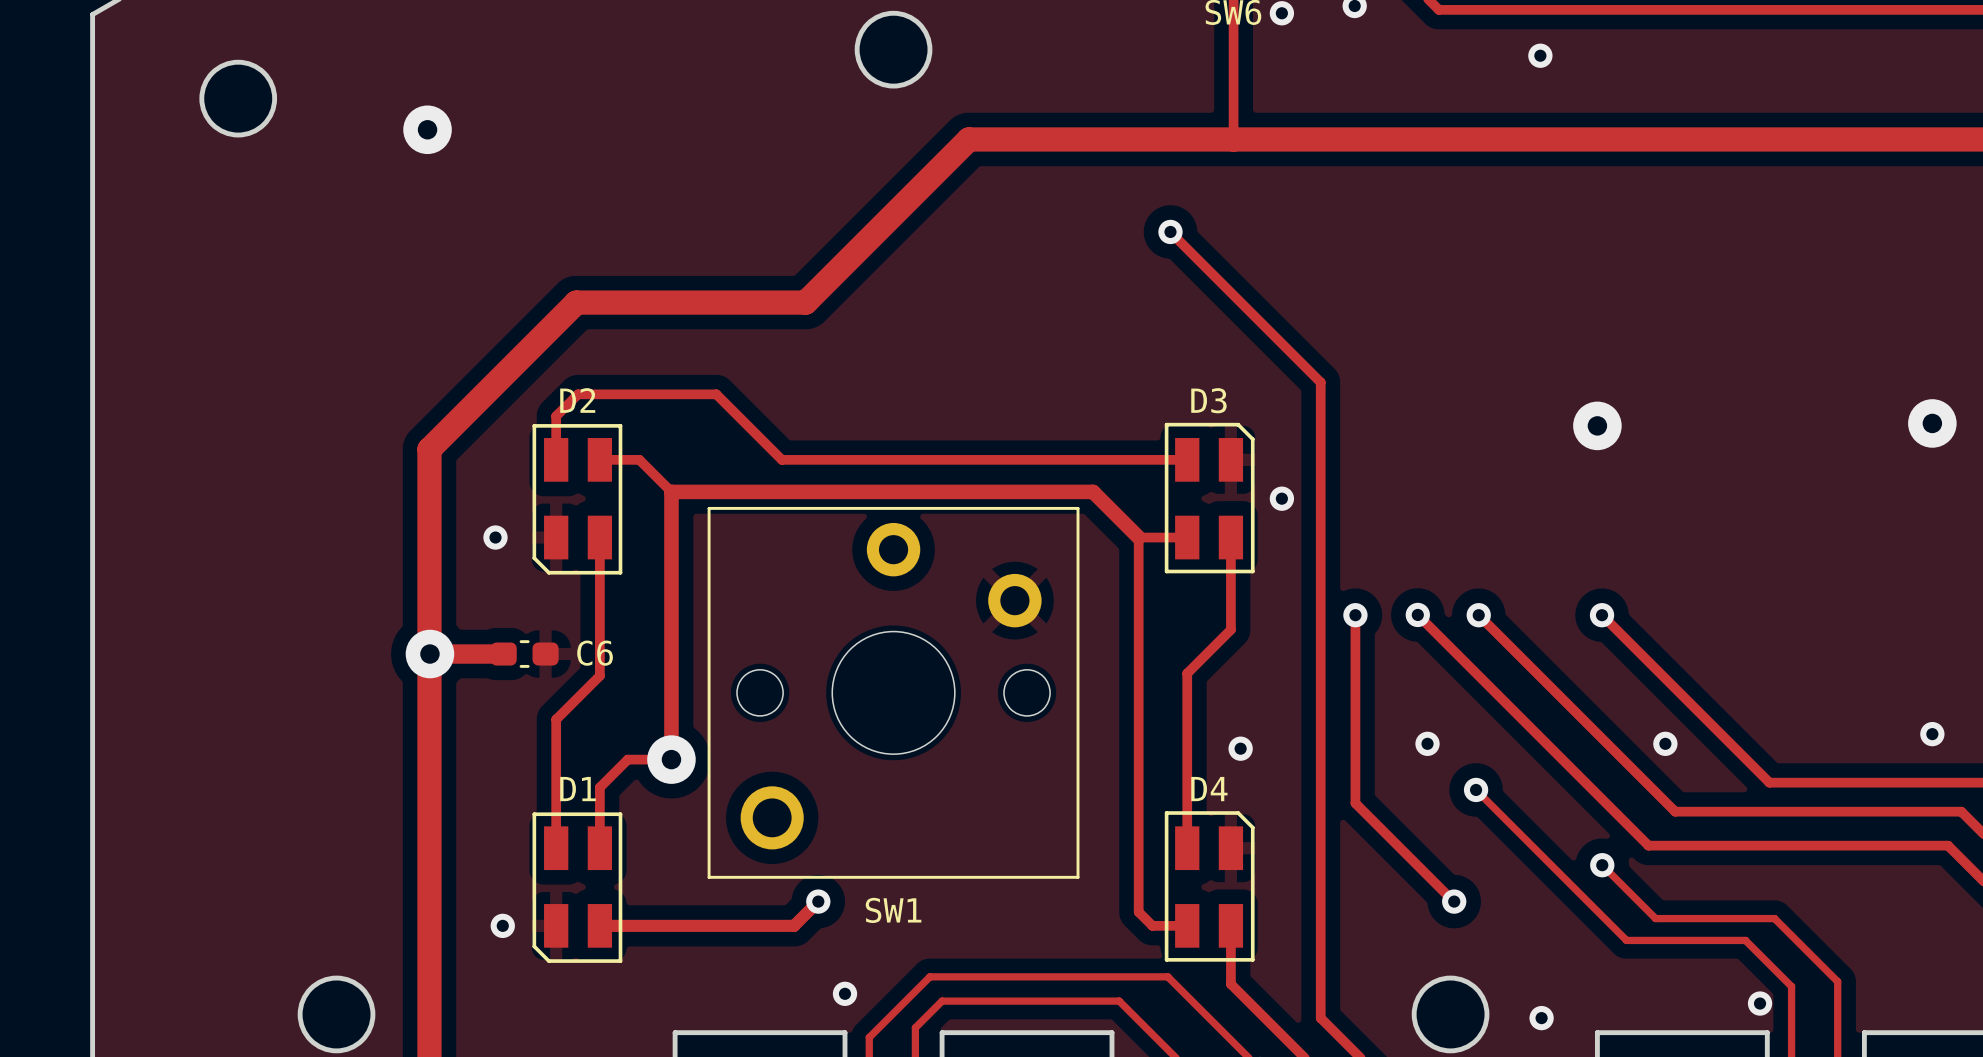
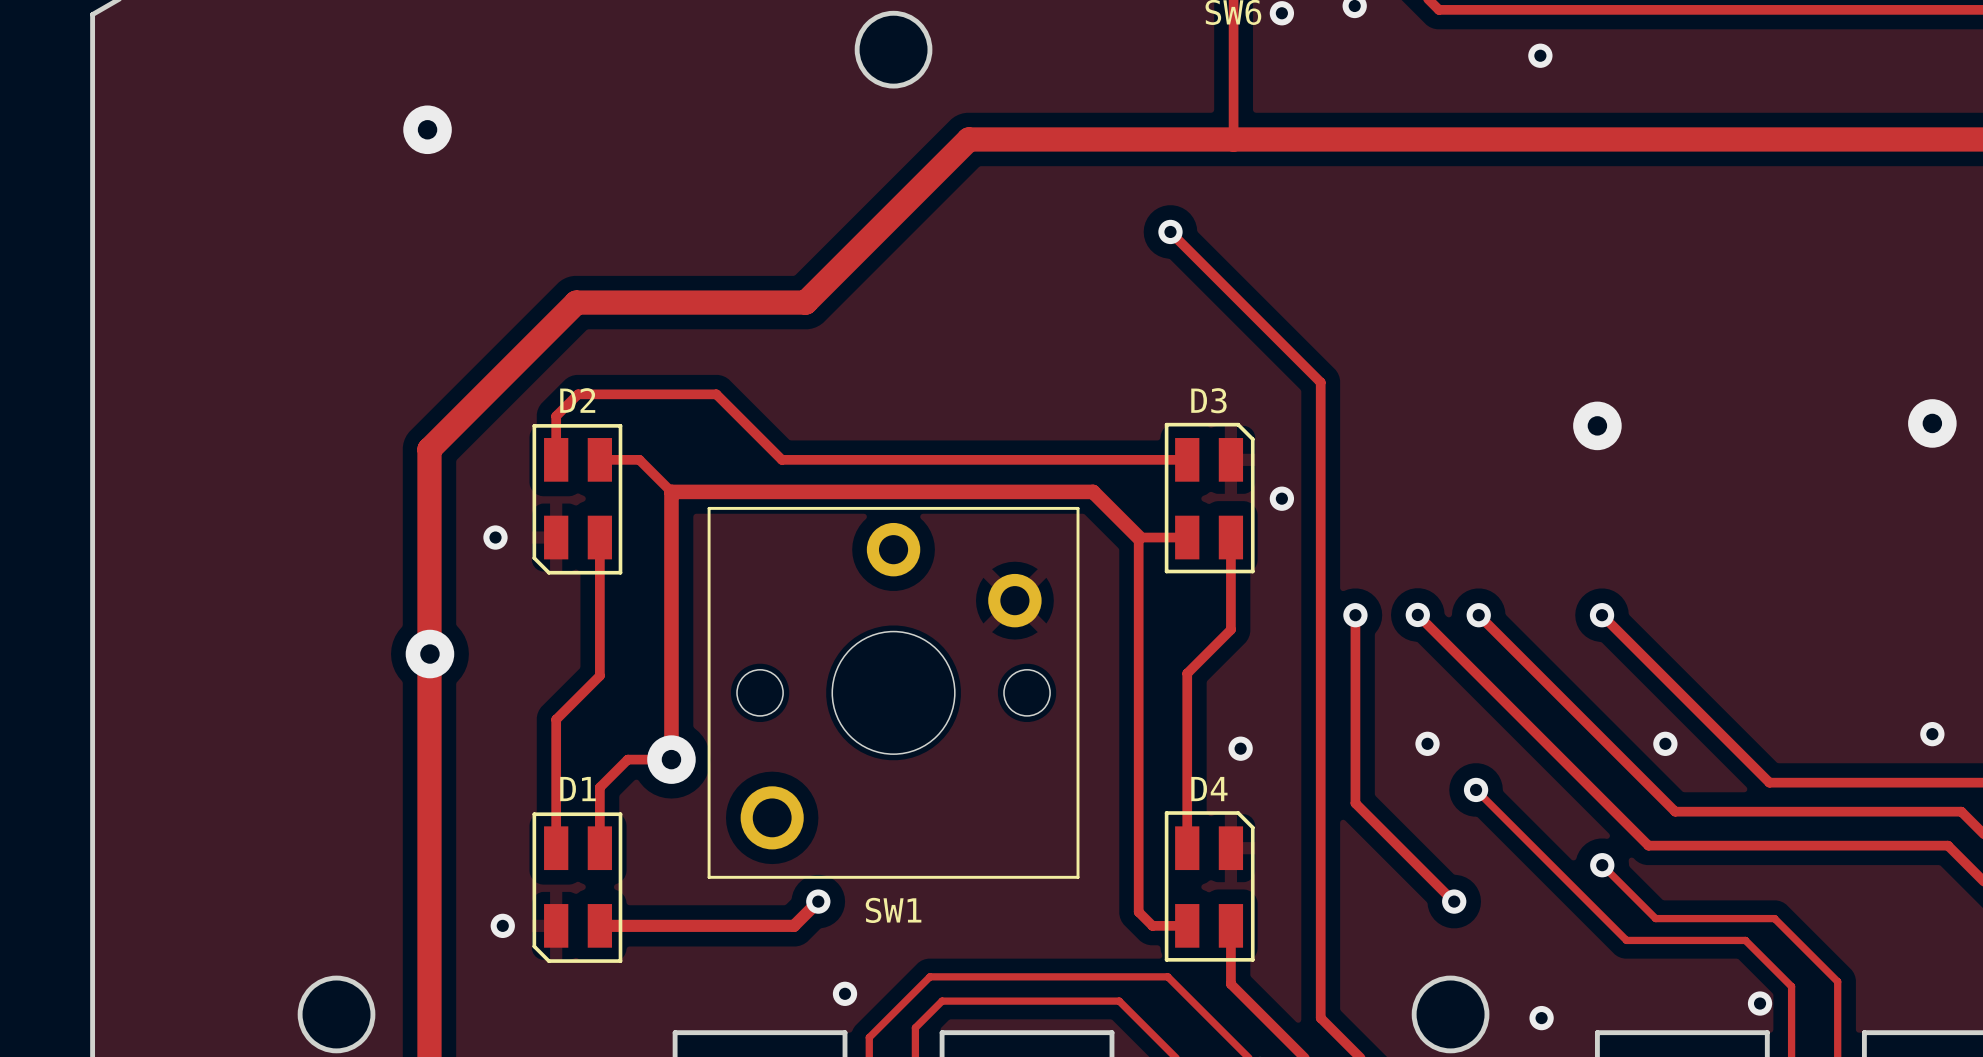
round board edge: [199, 59, 278, 138] -> none
track: (429, 654) (503, 654) -> none
C6: (524, 654) -> none

